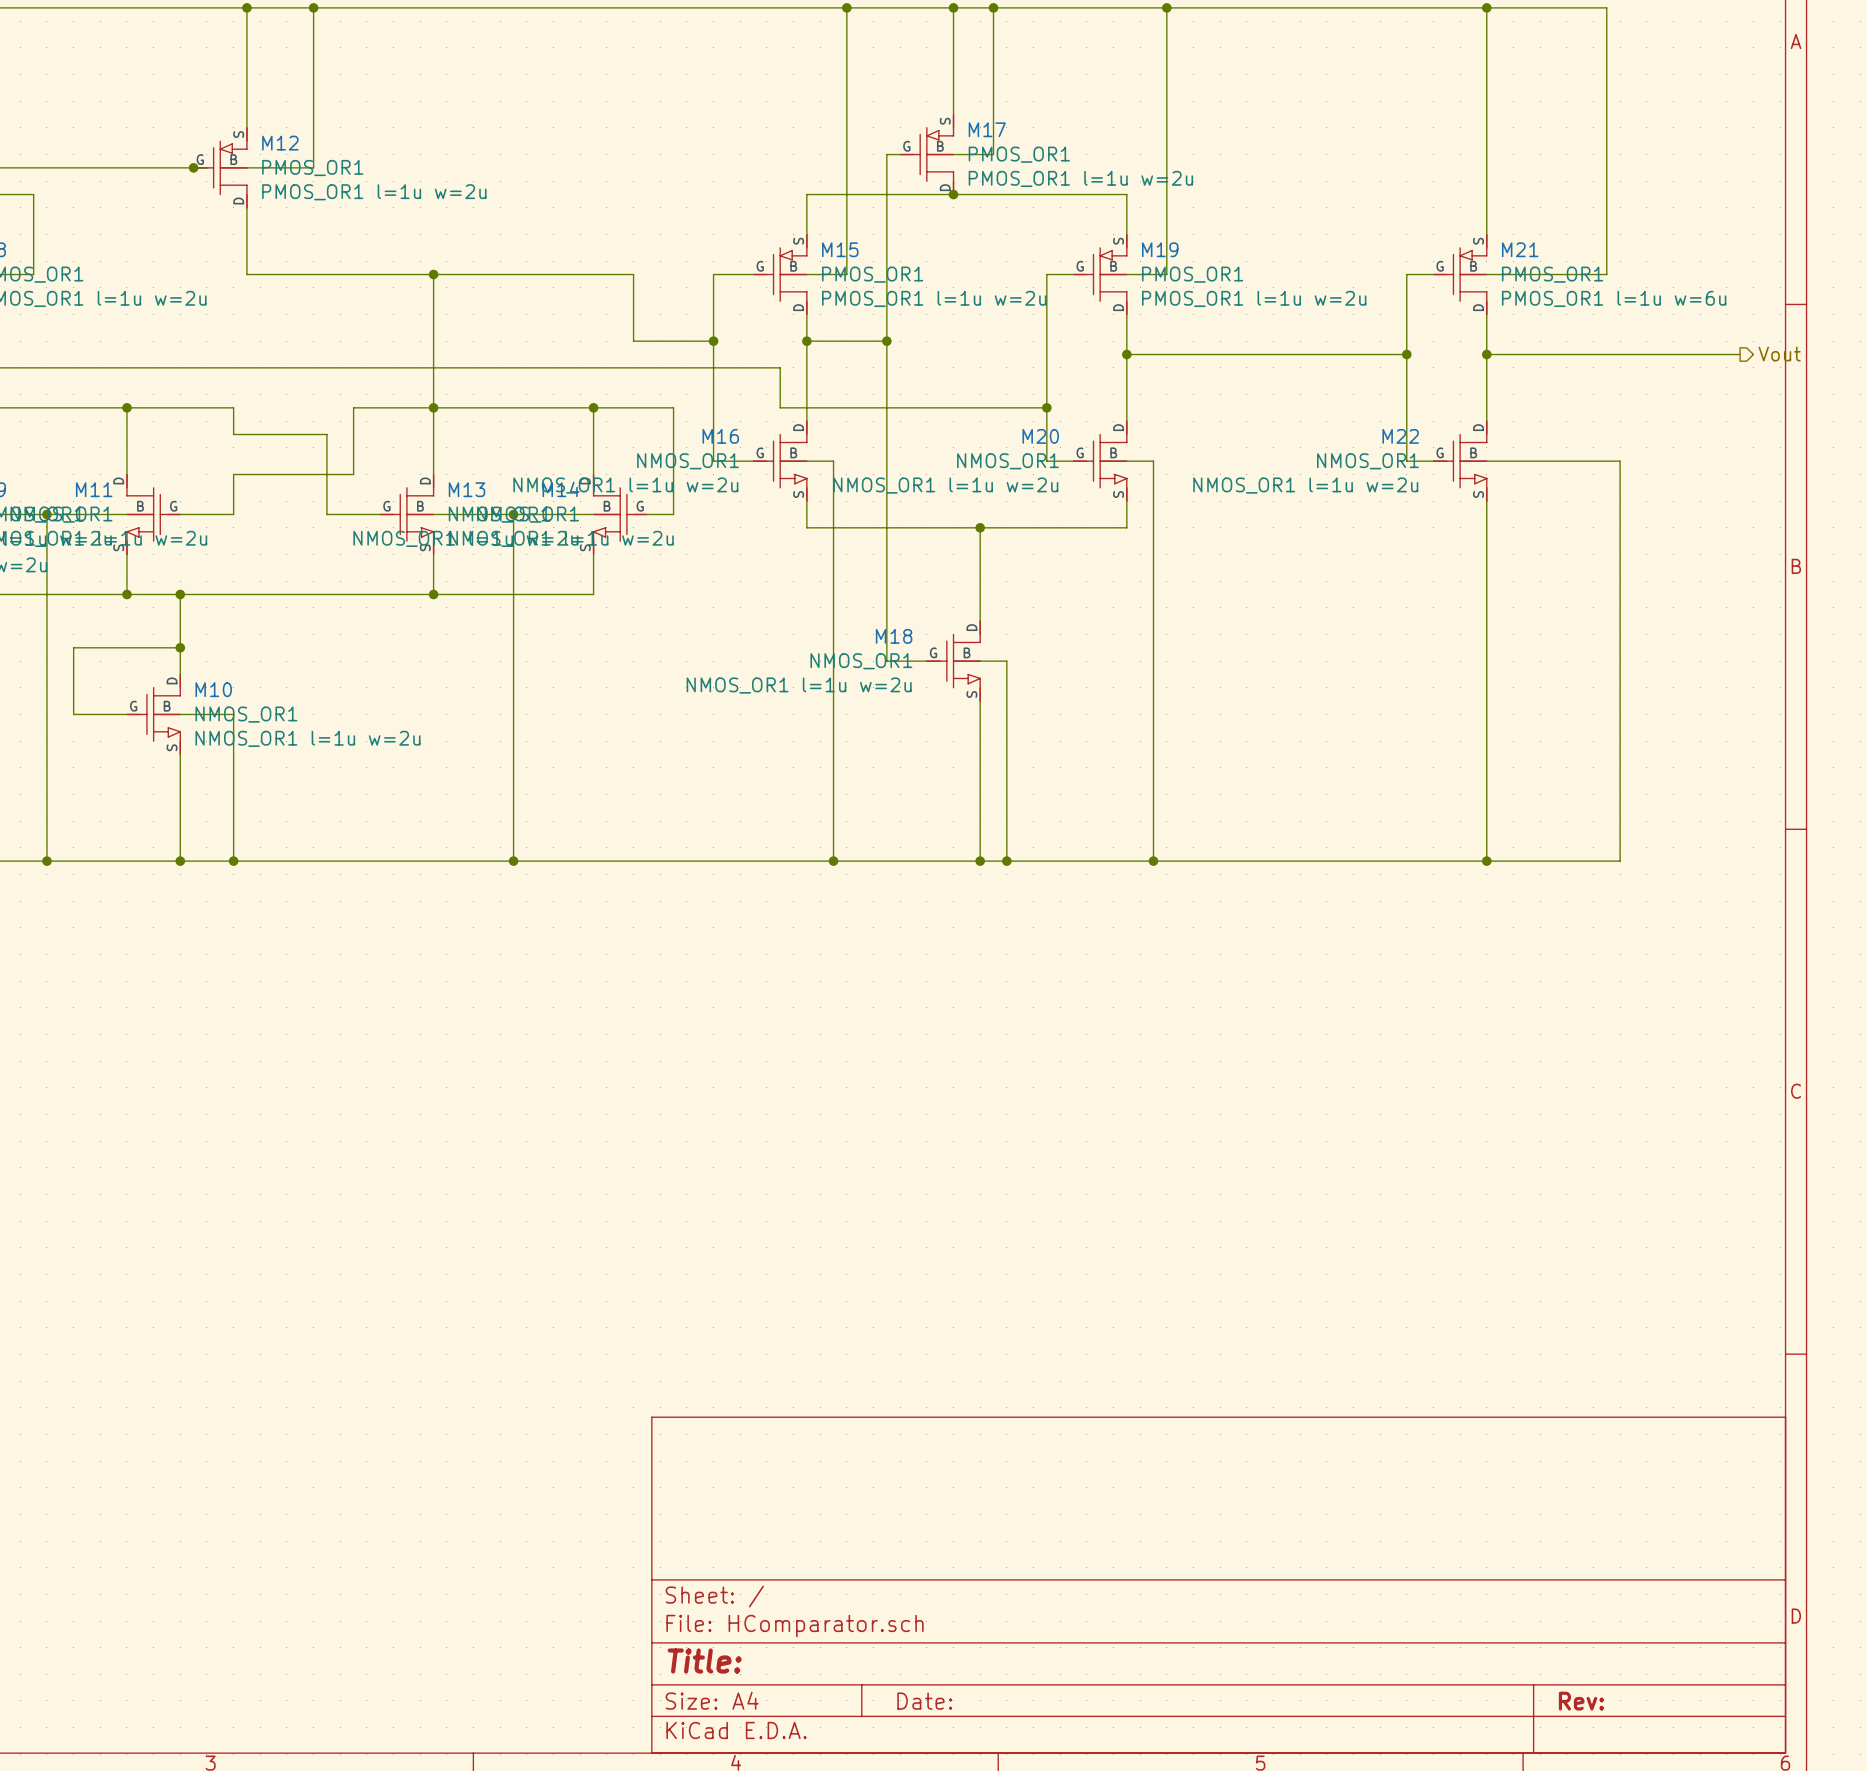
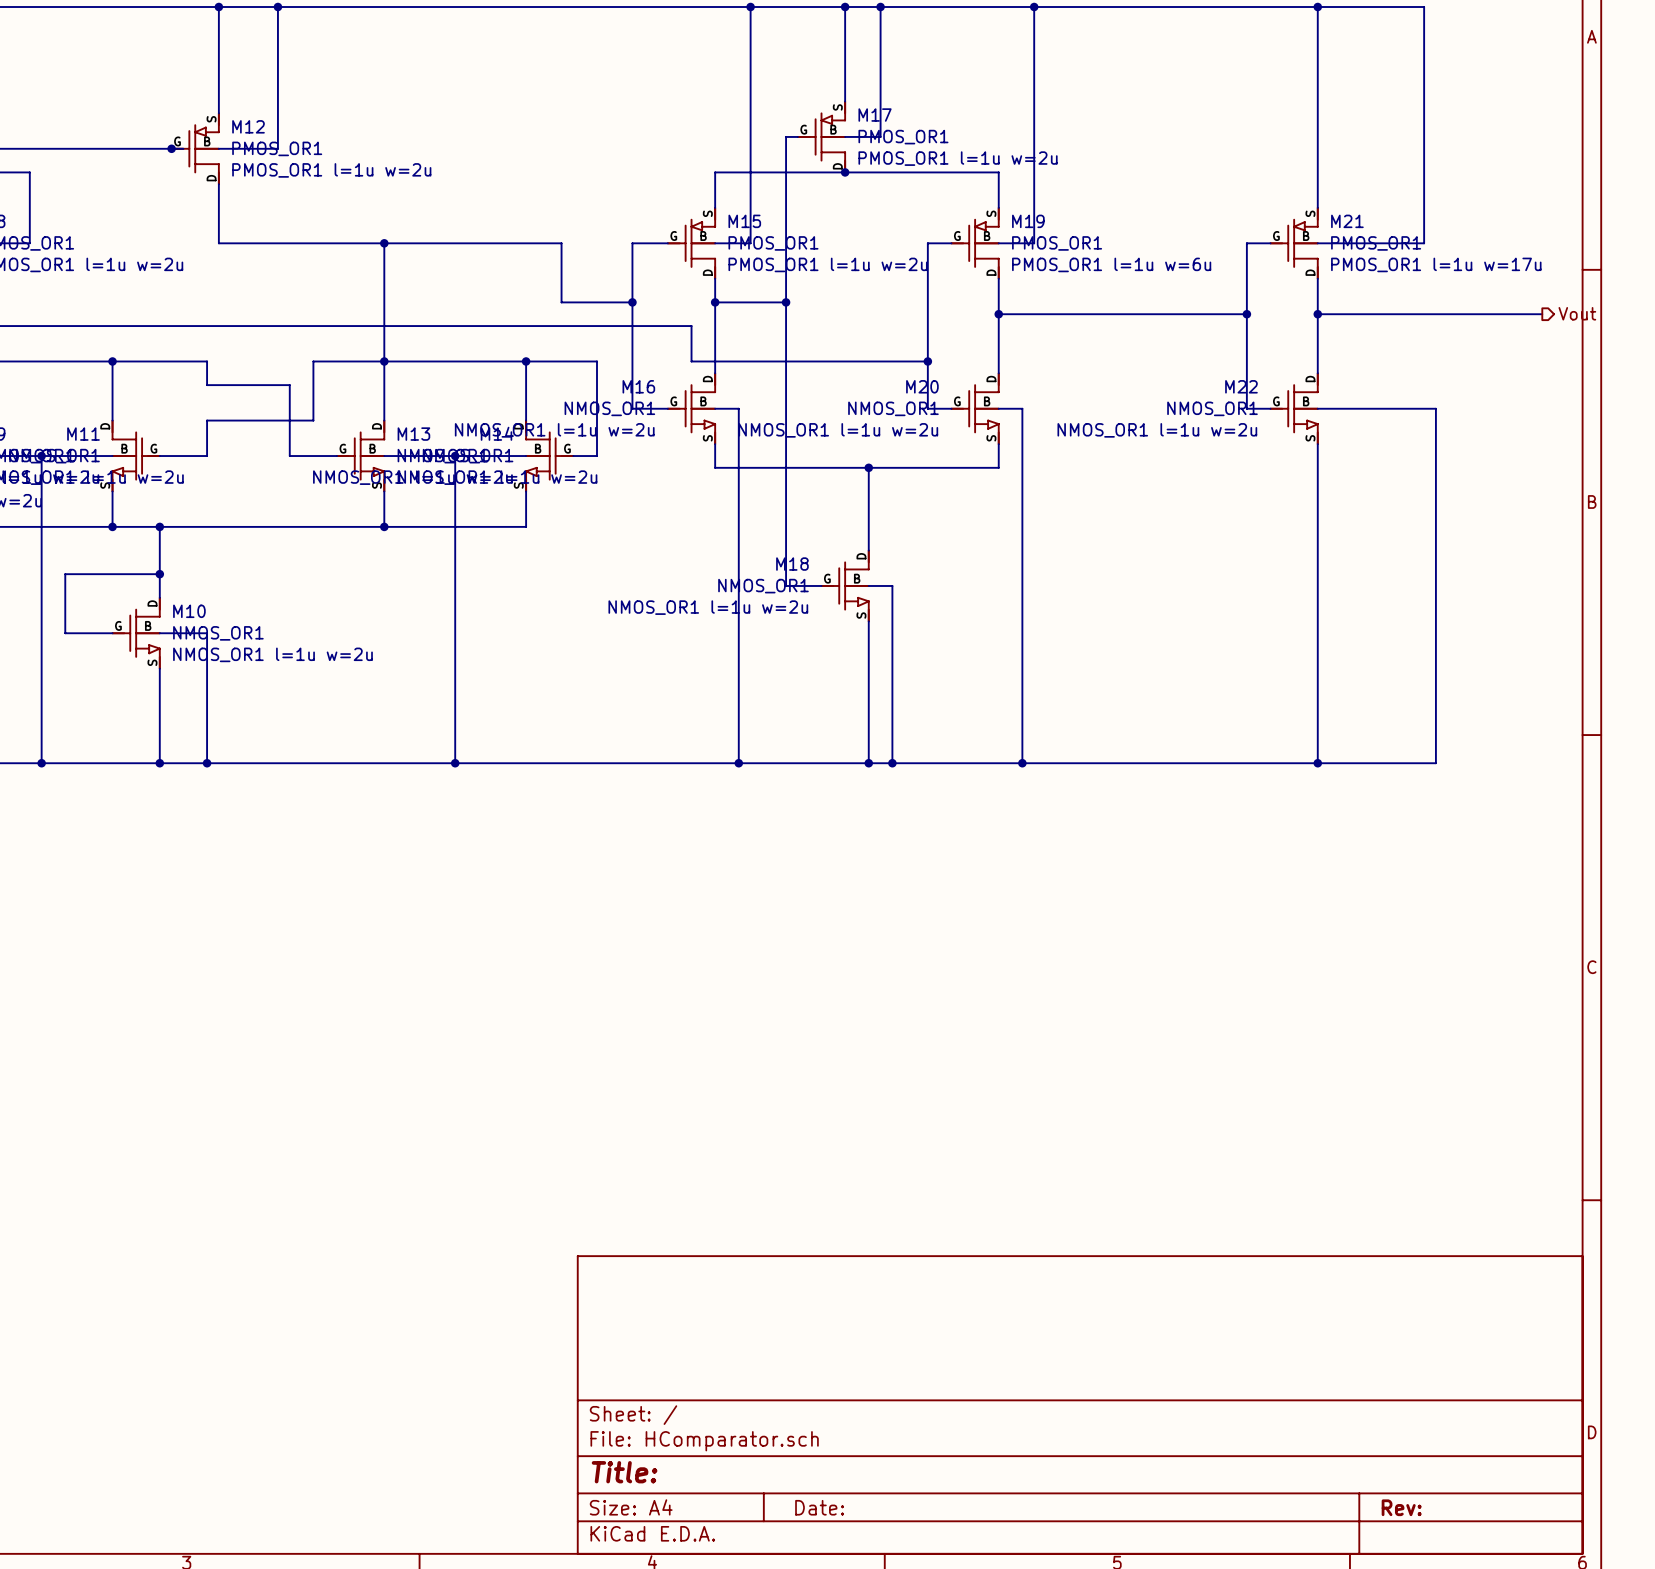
M19 text: PMOS_OR1 l=1u w=2u (1254, 298) -> PMOS_OR1 l=1u w=6u (1111, 264)
M21 text: PMOS_OR1 l=1u w=6u (1614, 298) -> PMOS_OR1 l=1u w=17u (1436, 264)

